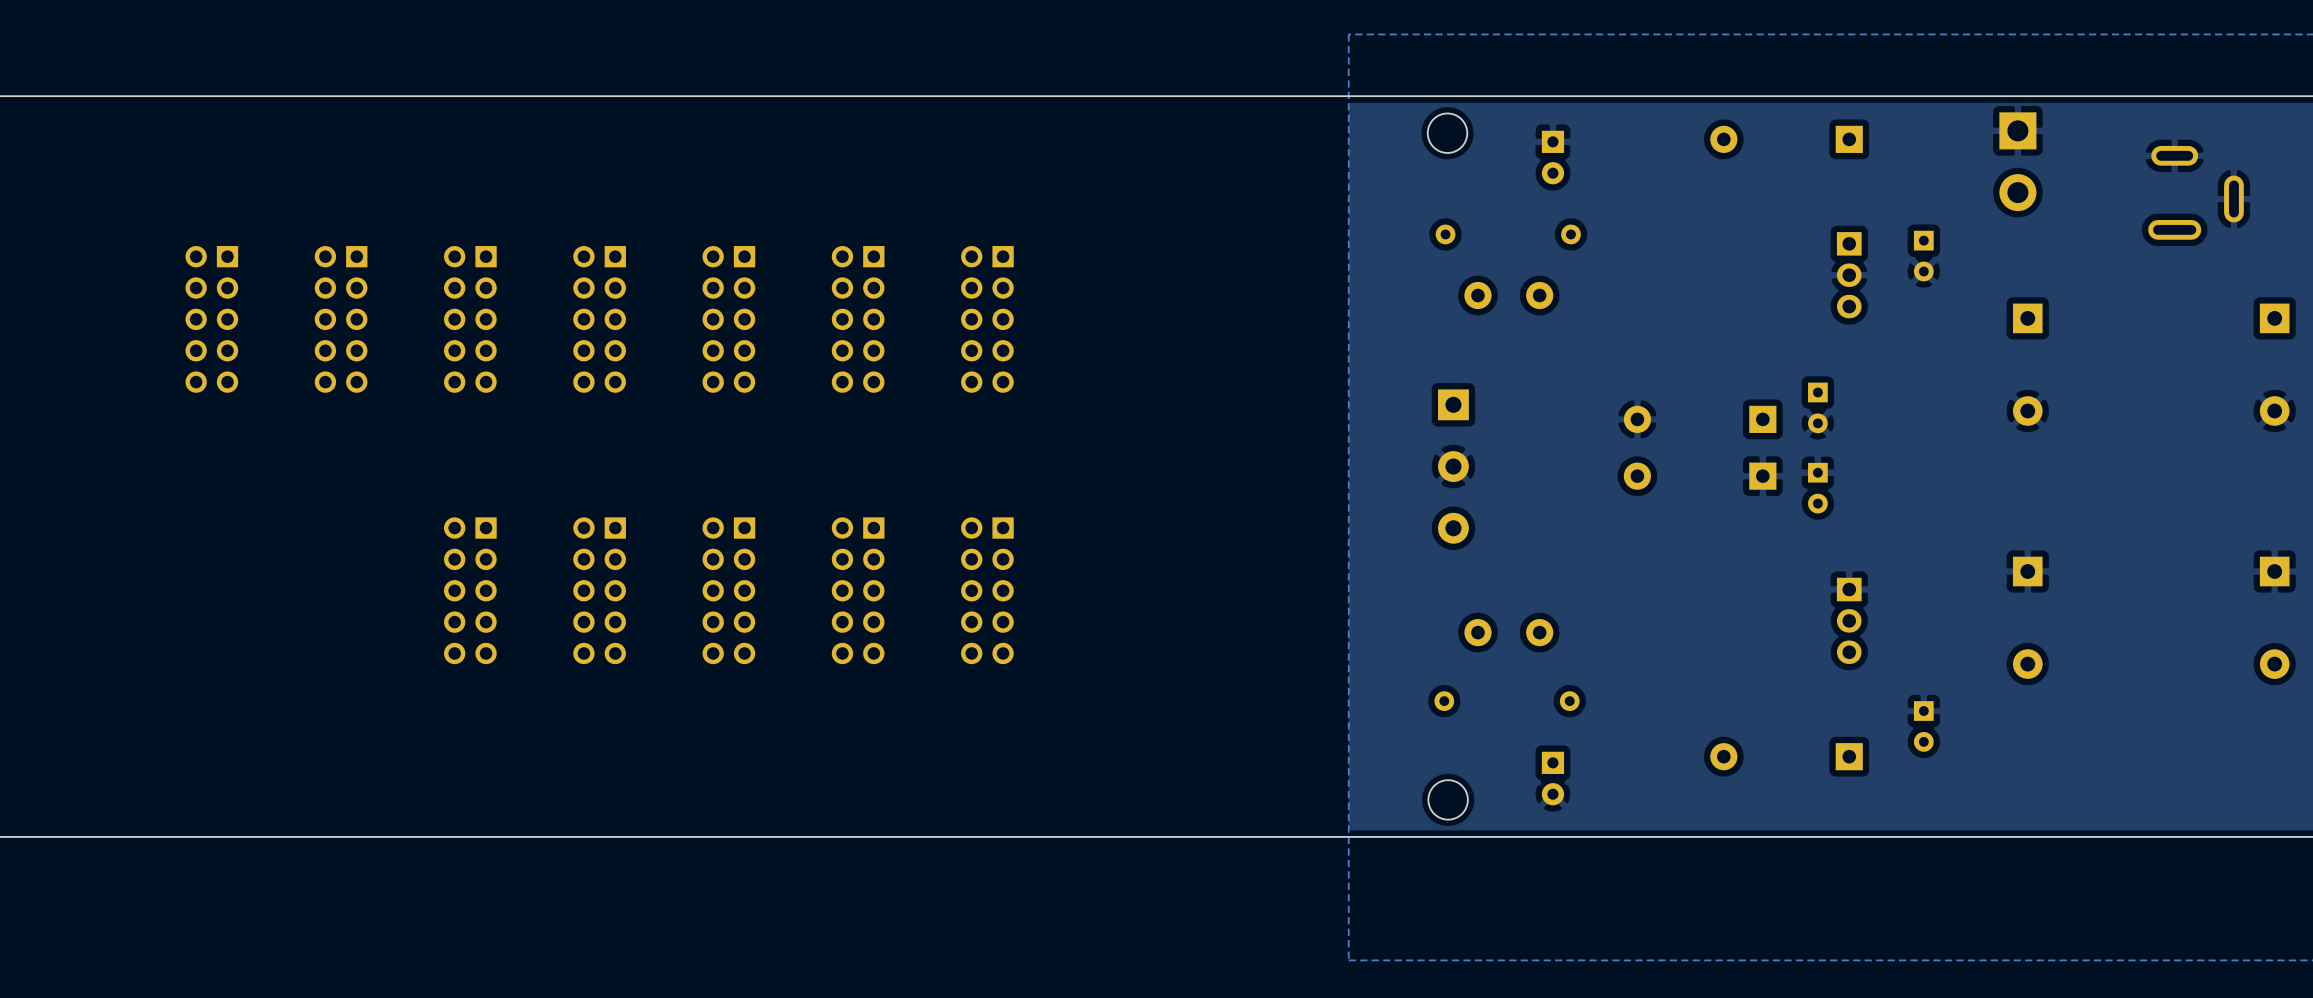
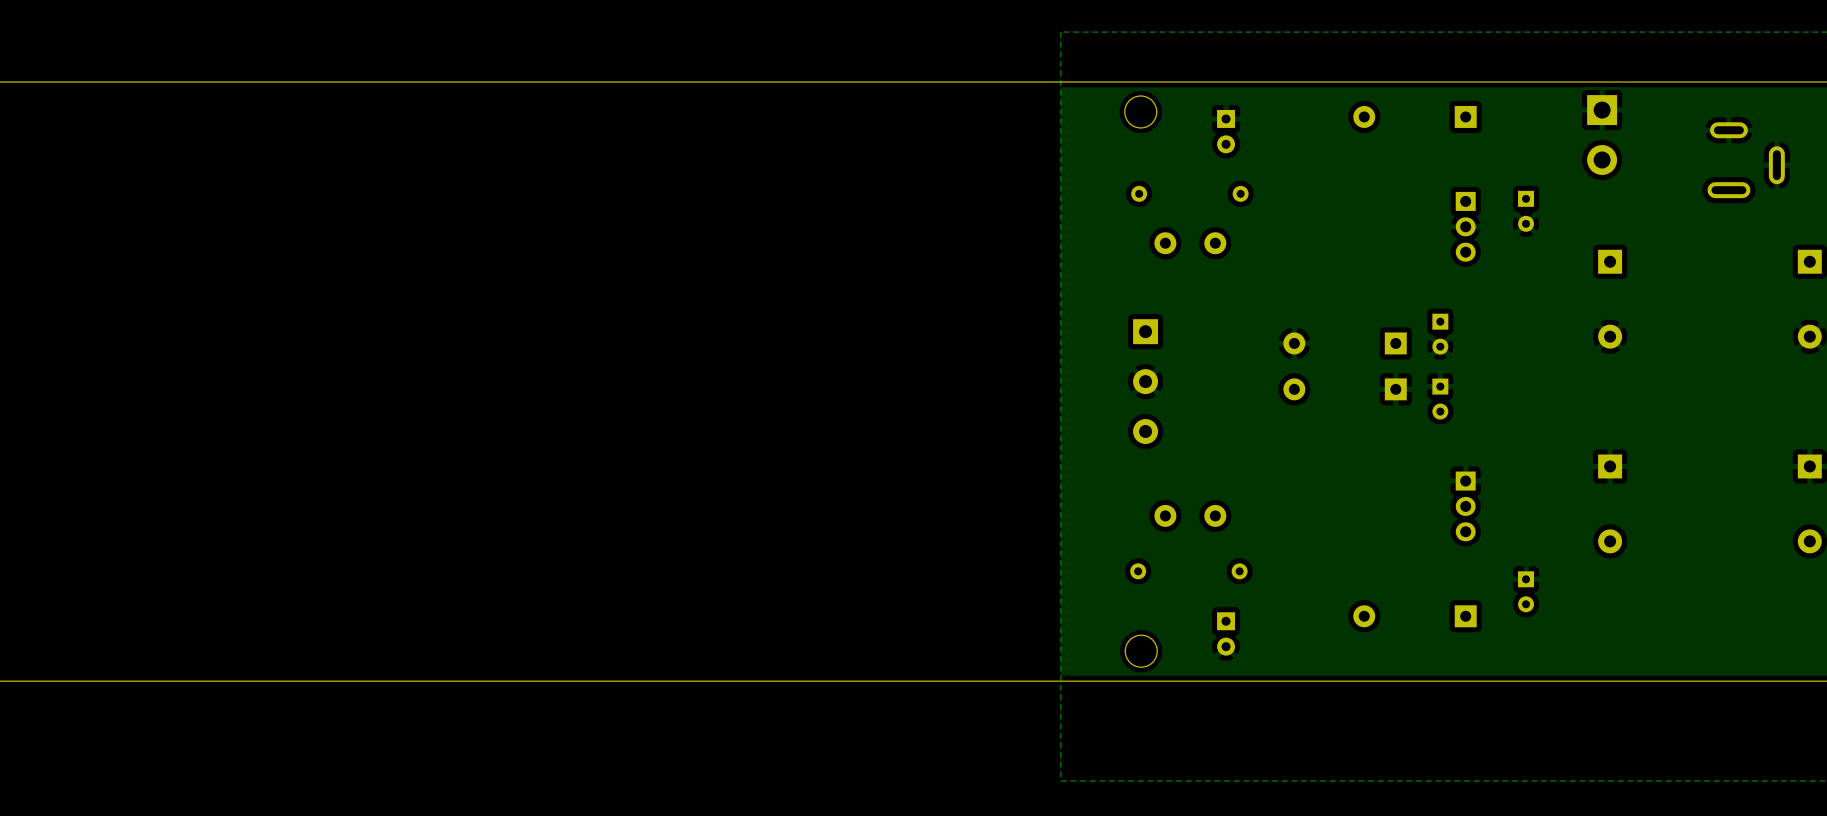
part: (211, 319) -> none
part: (341, 319) -> none
part: (470, 319) -> none
part: (599, 319) -> none
part: (728, 319) -> none
part: (858, 319) -> none
part: (987, 319) -> none
part: (470, 590) -> none
part: (599, 590) -> none
part: (728, 590) -> none
part: (858, 590) -> none
part: (987, 590) -> none

